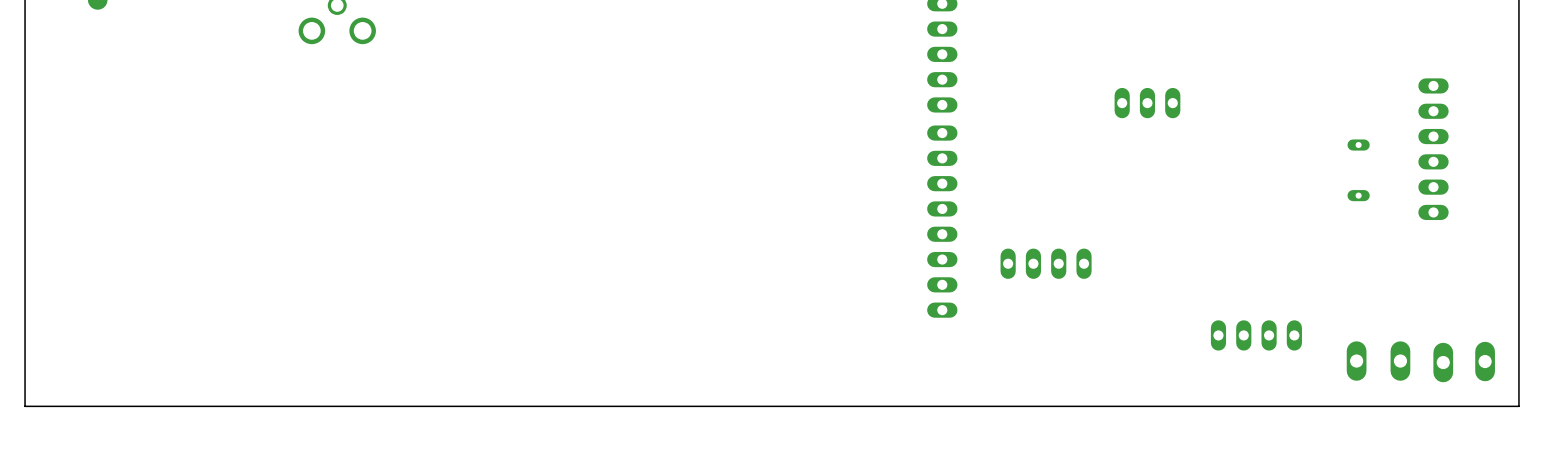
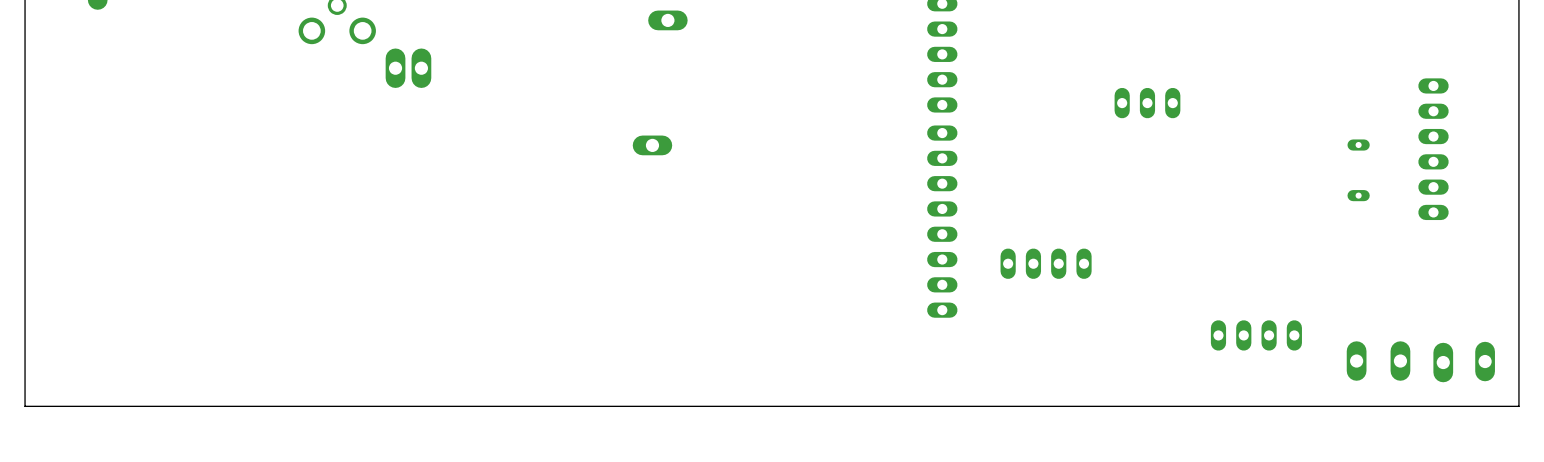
part: none -> (667, 20)
part: none -> (395, 68)
part: none -> (421, 68)
part: none -> (652, 145)

